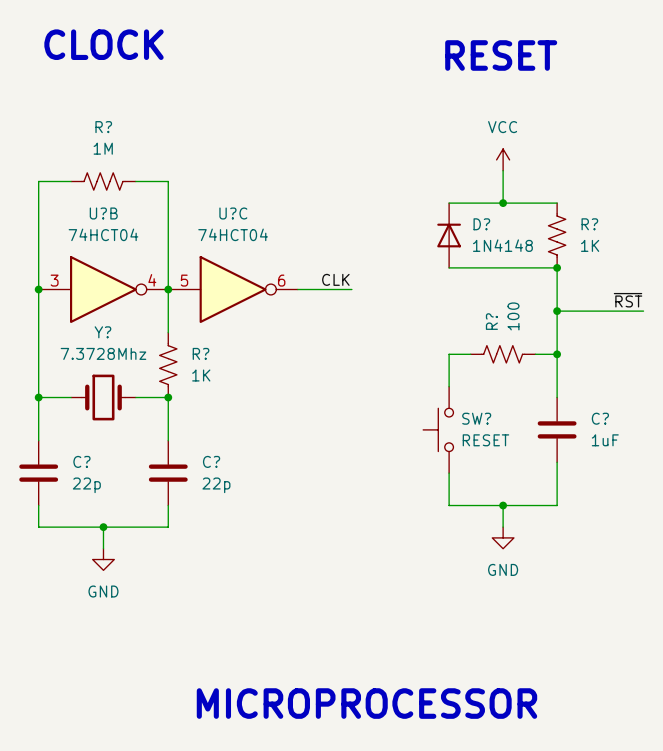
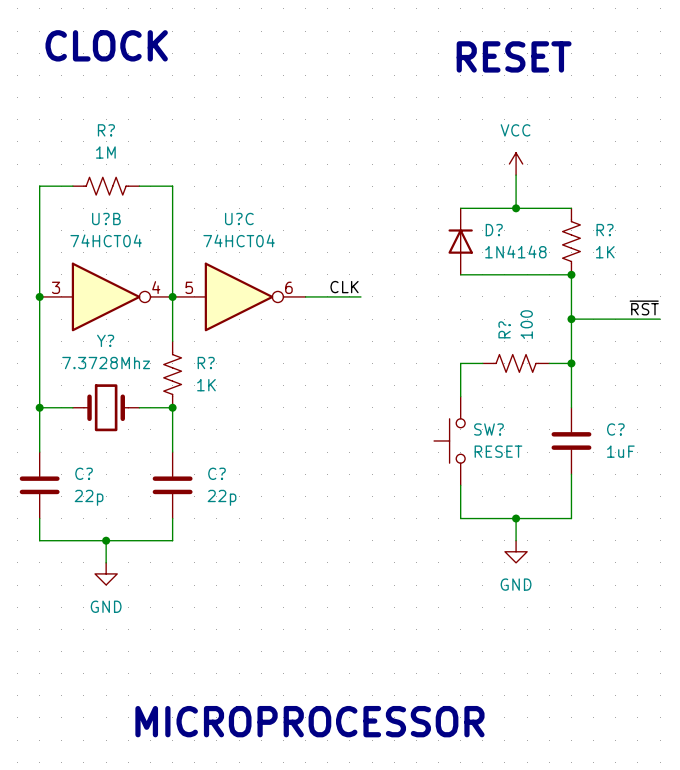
text position: MICROPROCESSOR (366, 703) -> MICROPROCESSOR (309, 721)

